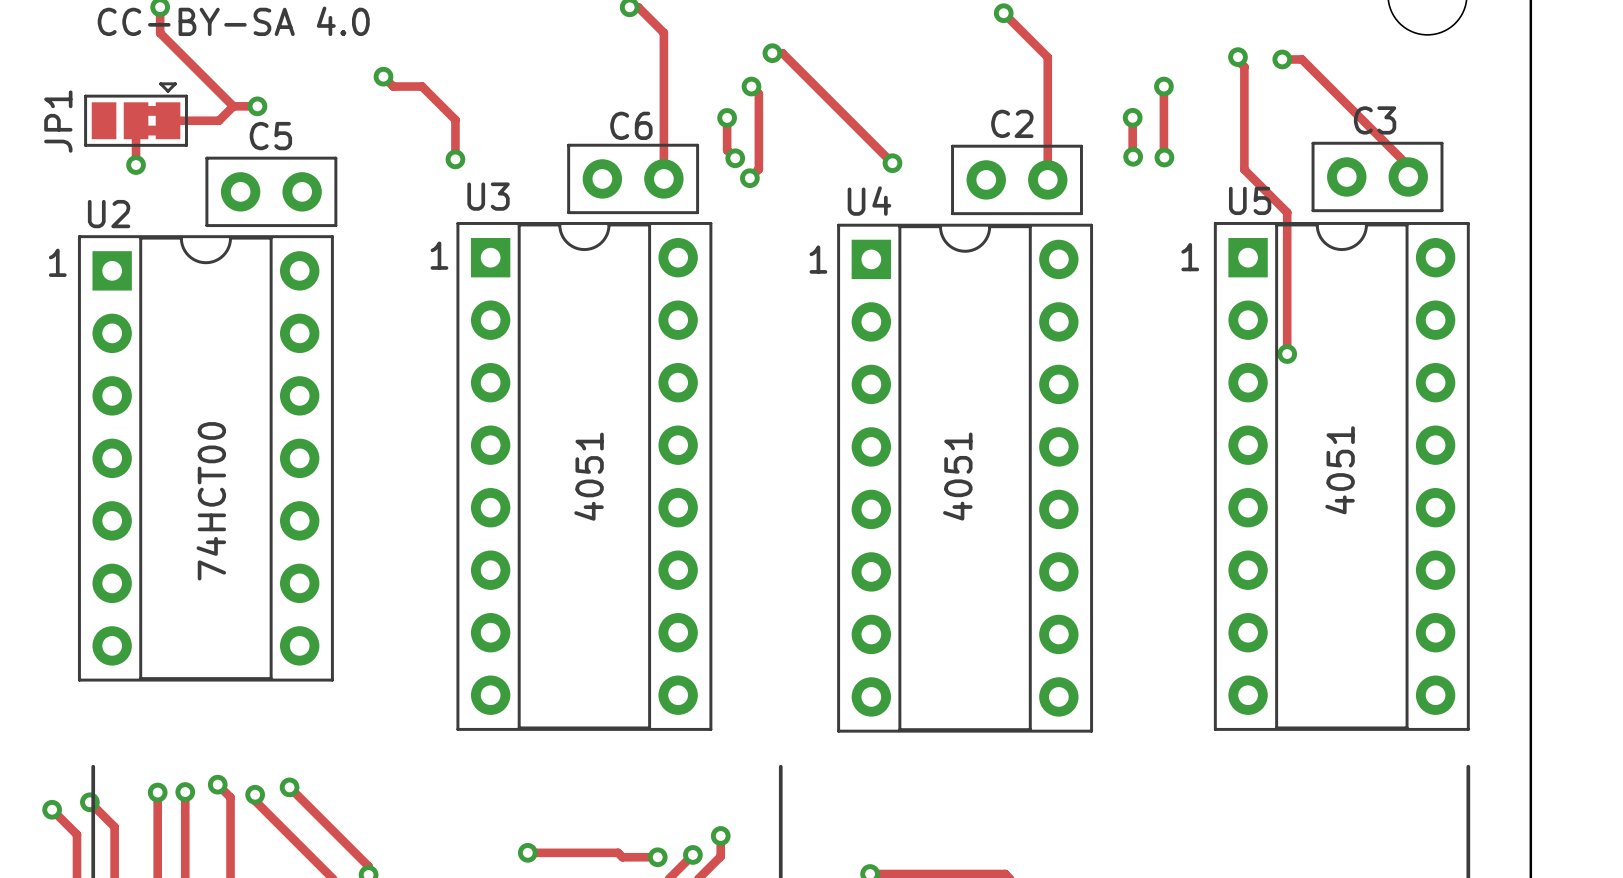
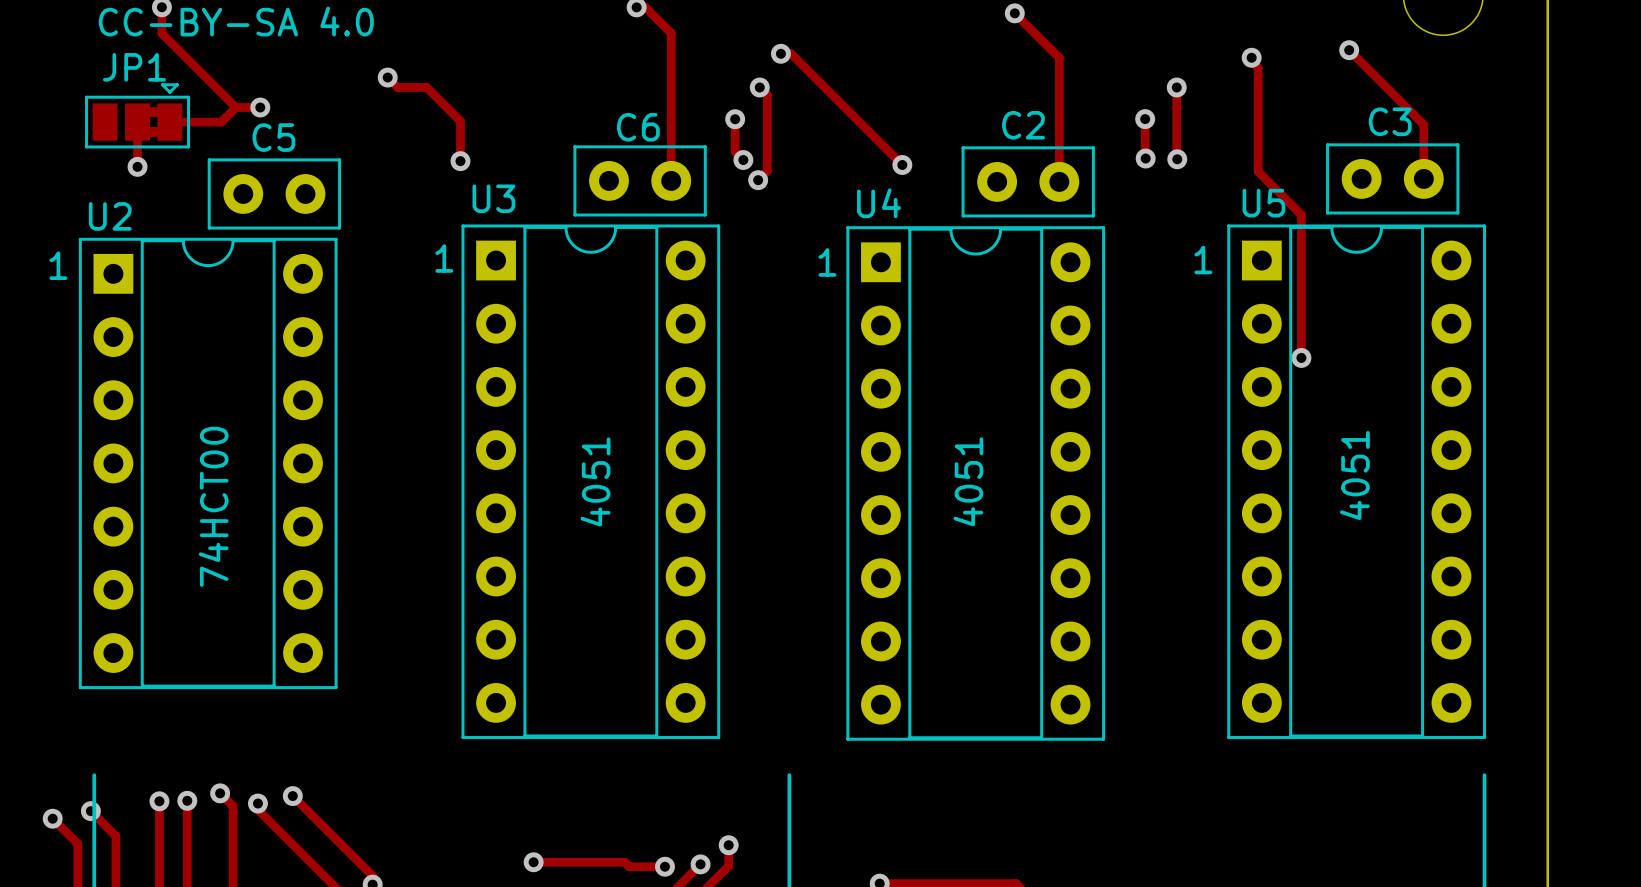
track: (1282, 59) (1301, 59) (1408, 165) -> (1349, 50) (1423, 124) (1423, 167)
via position: (1282, 59) -> (1349, 50)
JP1 name rotation: 0° (58, 121) -> 90° clockwise (134, 67)
JP1 name position: JP1 (58, 121) -> JP1 (134, 67)

